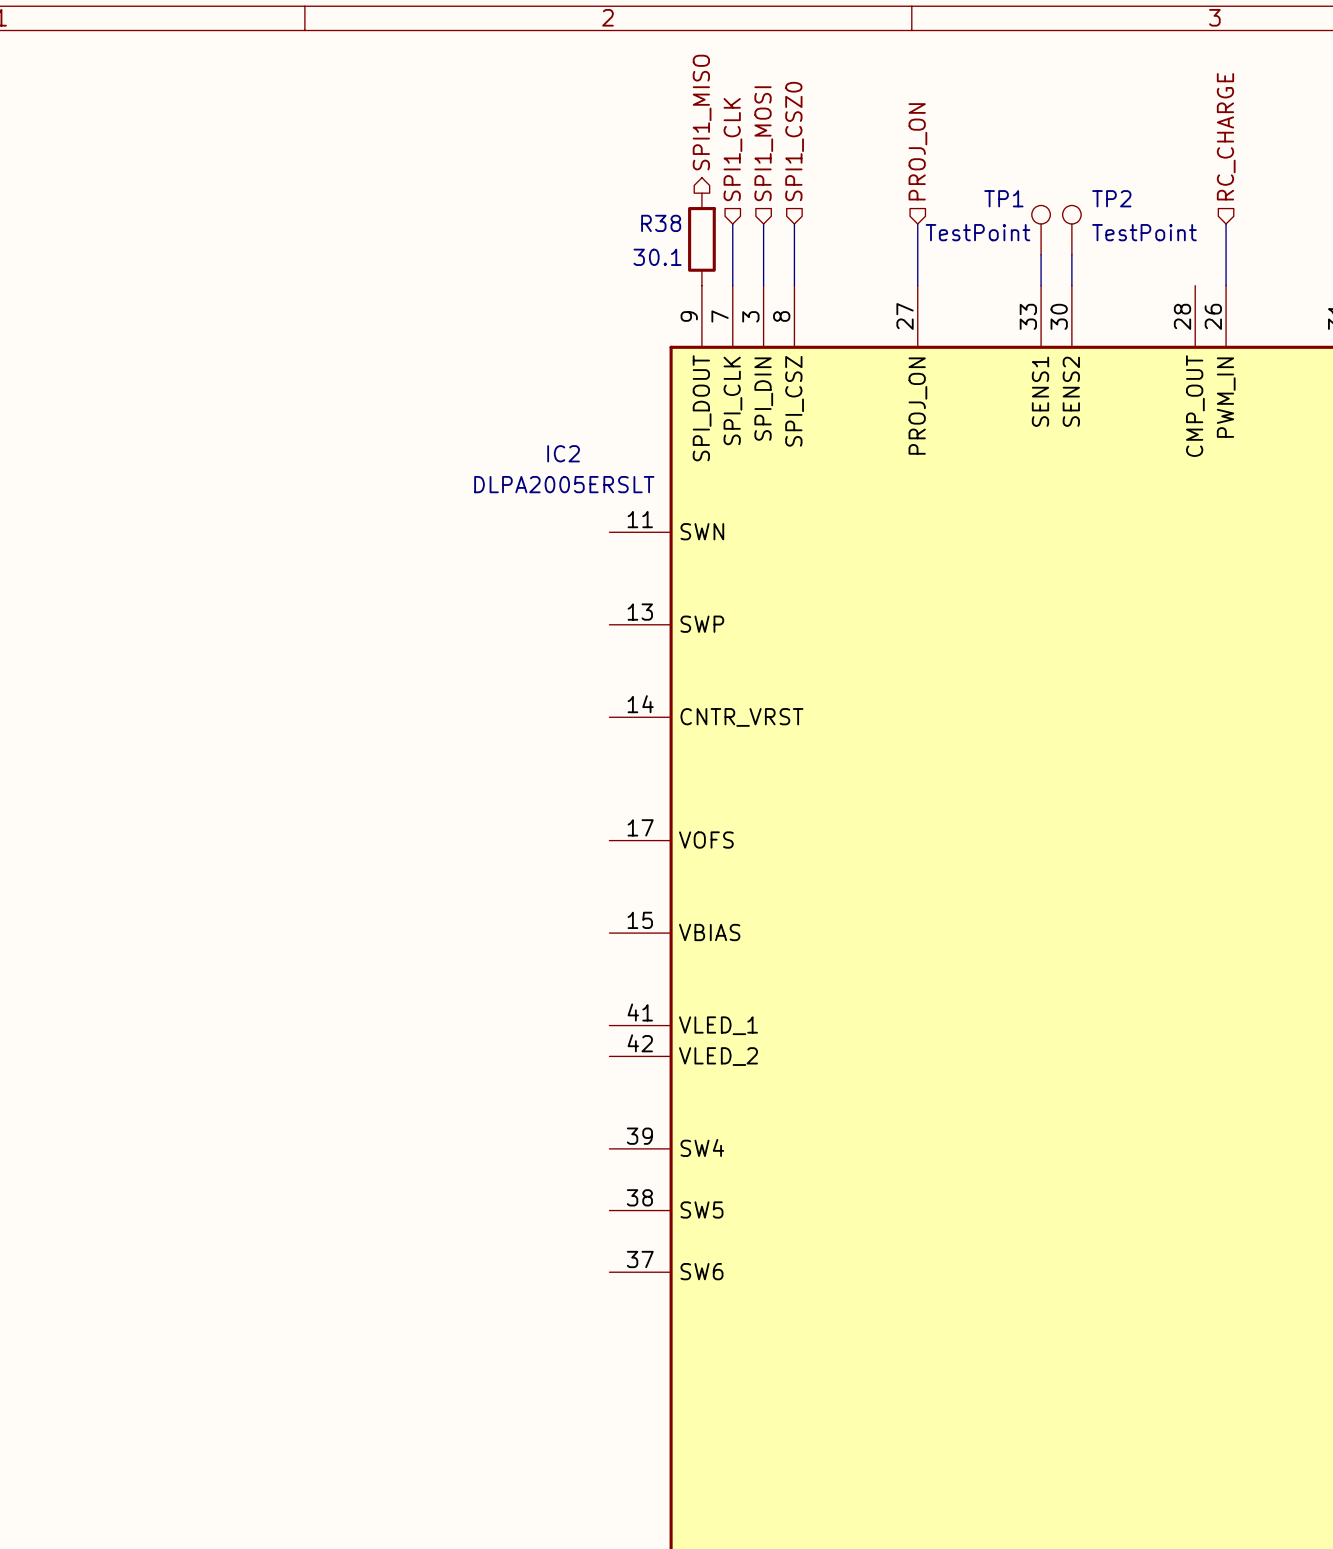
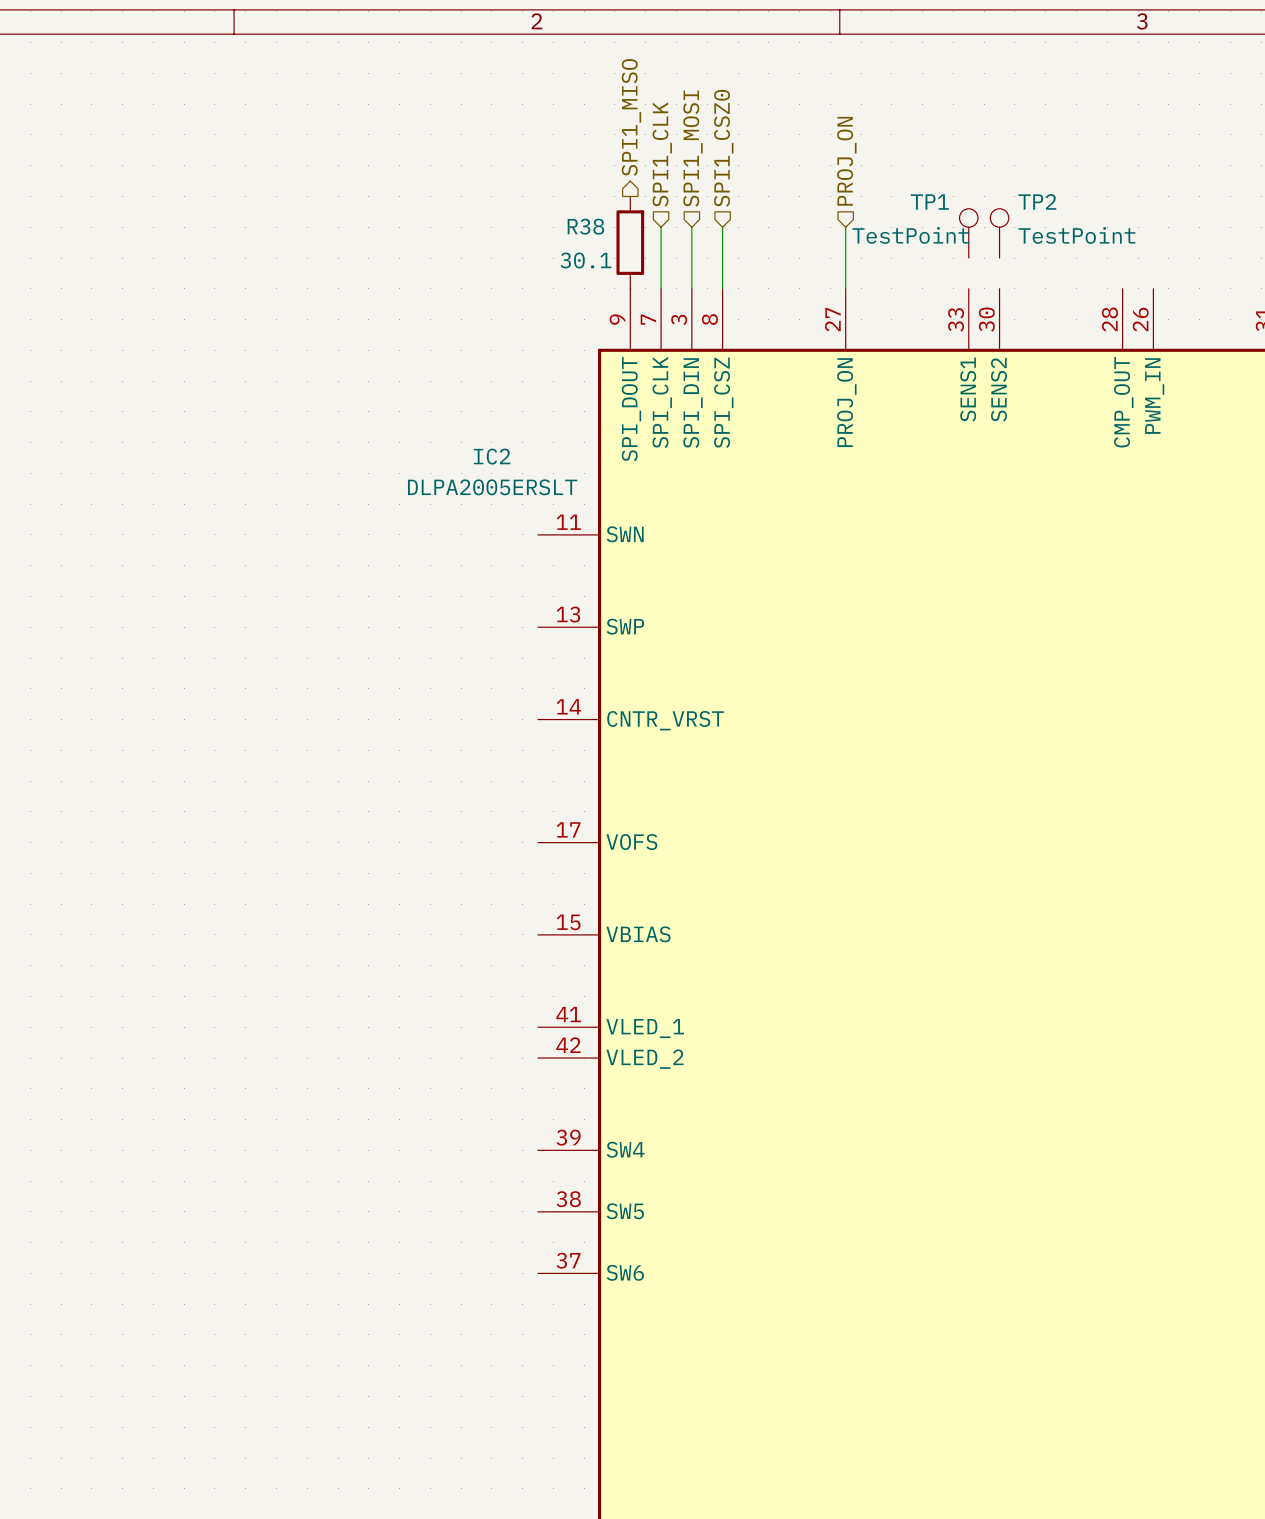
hierarchical label: RC_CHARGE (1226, 136) -> none
wire: (1226, 223) (1226, 285) -> none
wire: (1041, 254) (1041, 285) -> none
wire: (1071, 254) (1071, 285) -> none

